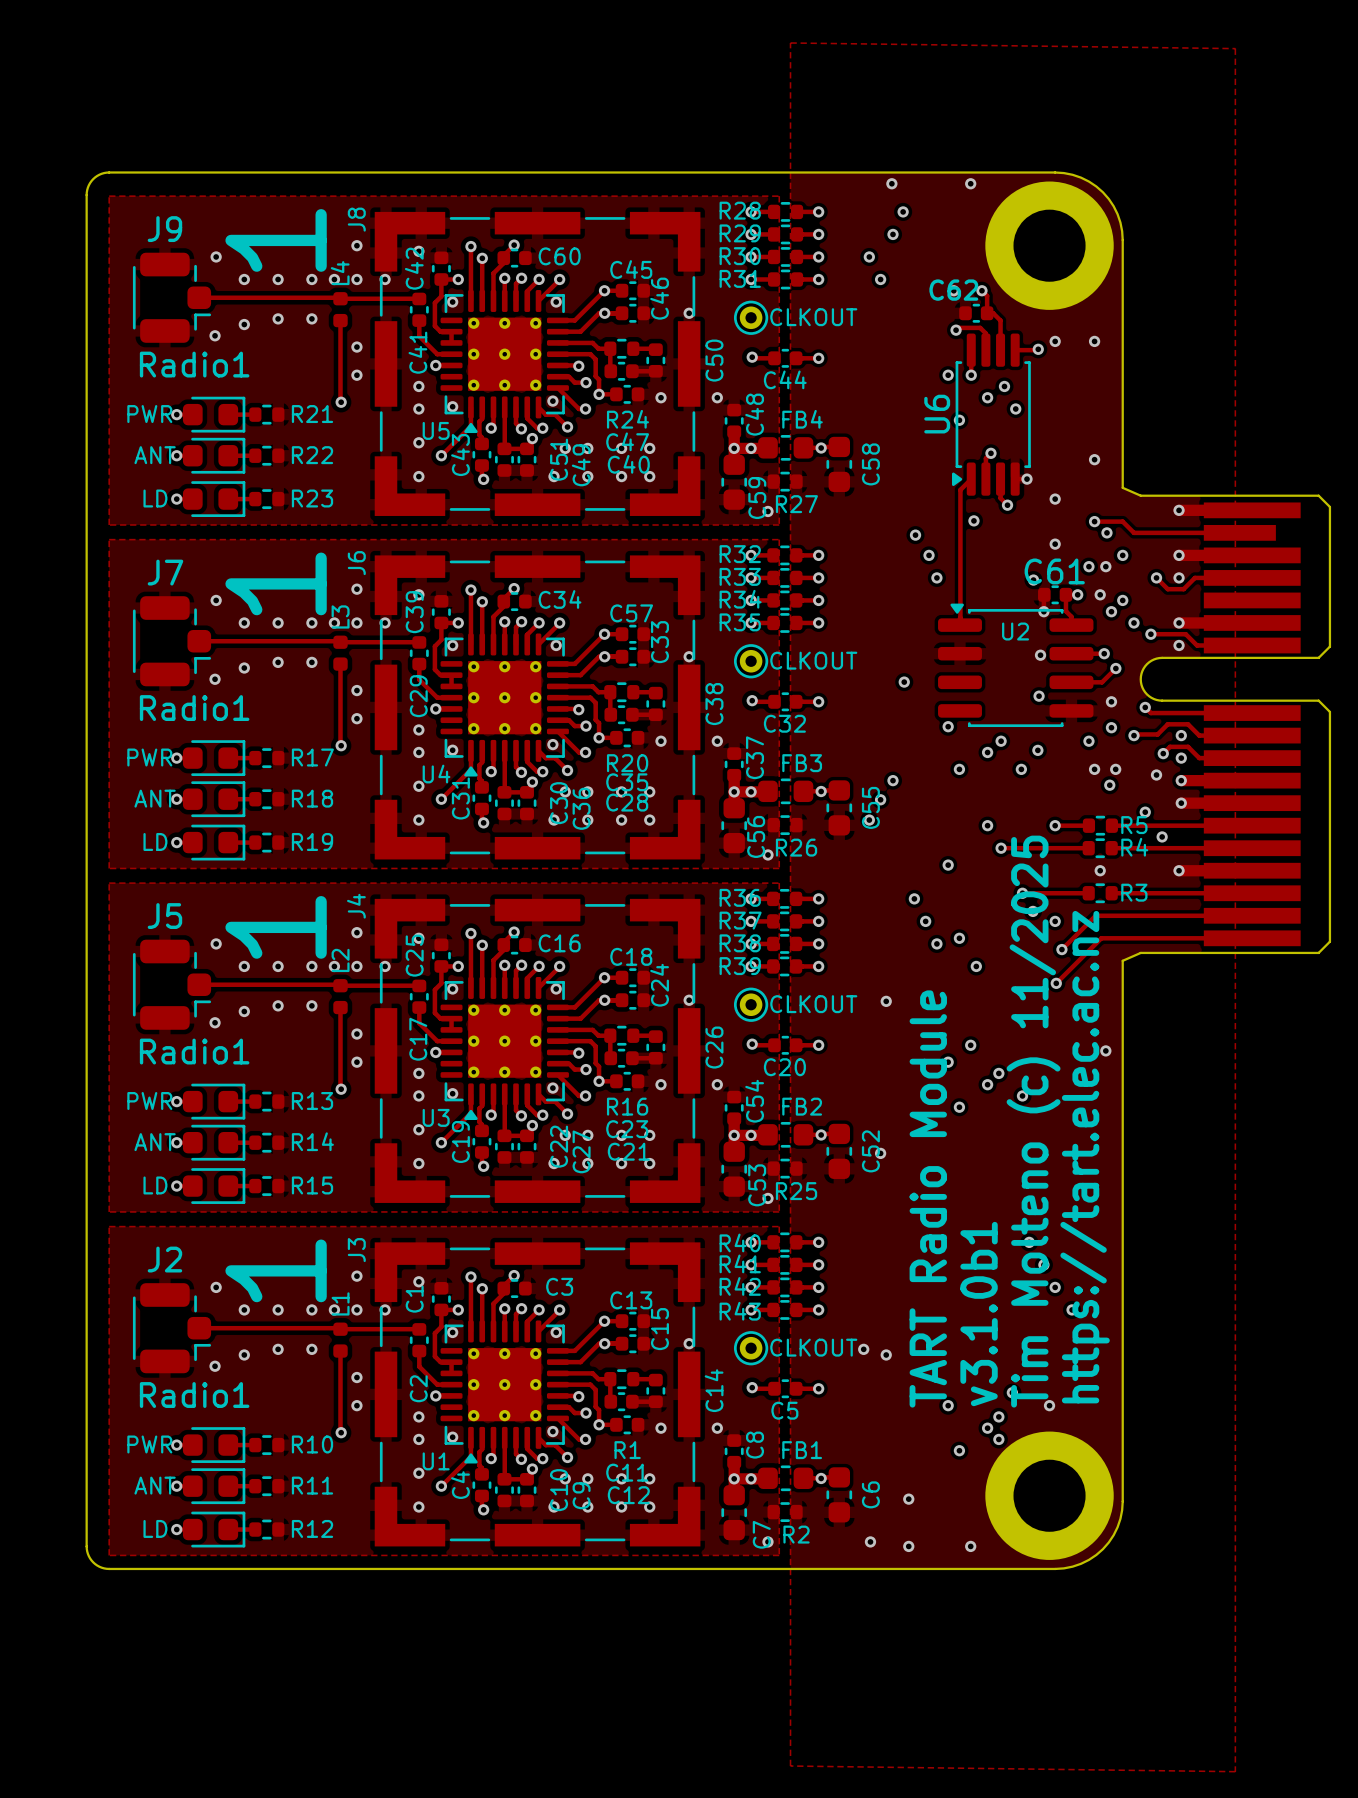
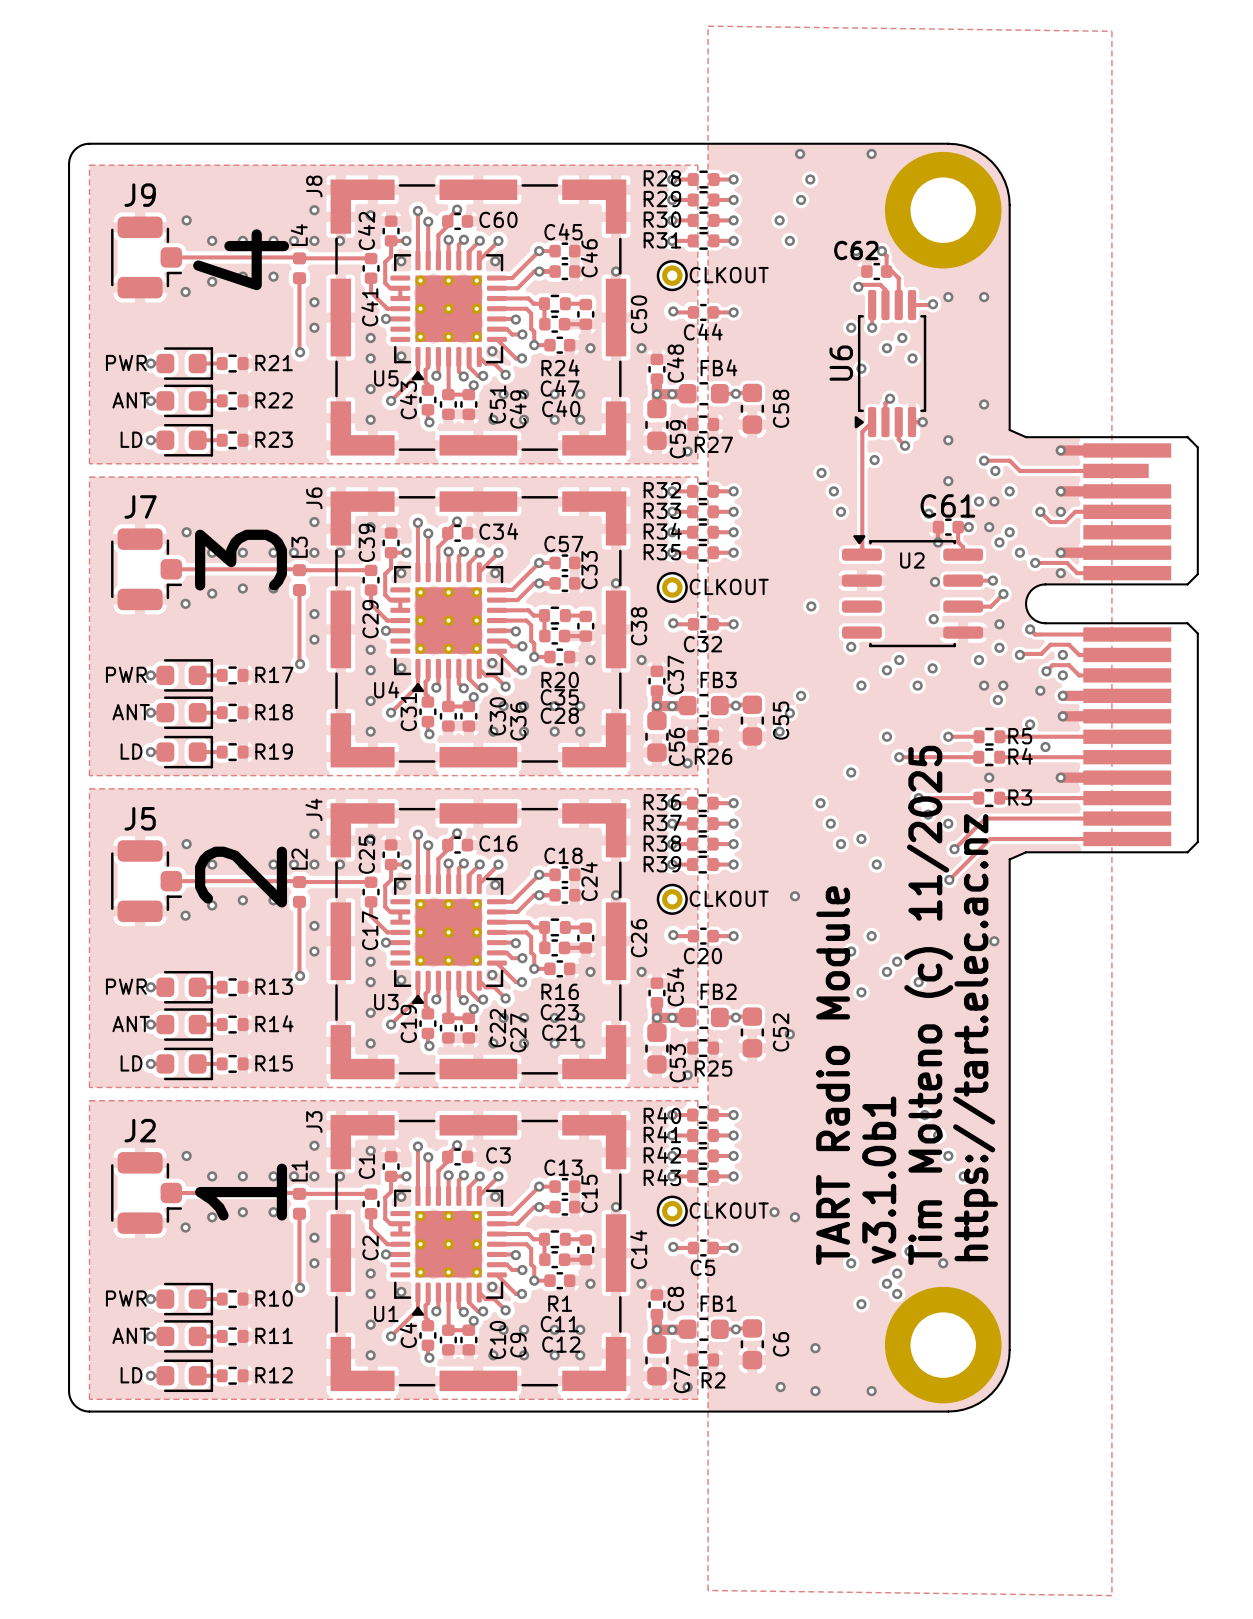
text: 1 (276, 240) -> none
text: none -> 4 (241, 259)
text: Radio1 (194, 364) -> none
text: 1 (276, 583) -> none
text: none -> 3 (241, 560)
text: Radio1 (194, 708) -> none
text: 1 (276, 927) -> none
text: none -> 2 (241, 877)
text: Radio1 (194, 1051) -> none
text position: 1 (276, 1270) -> 1 (241, 1192)
text: Radio1 (194, 1395) -> none

